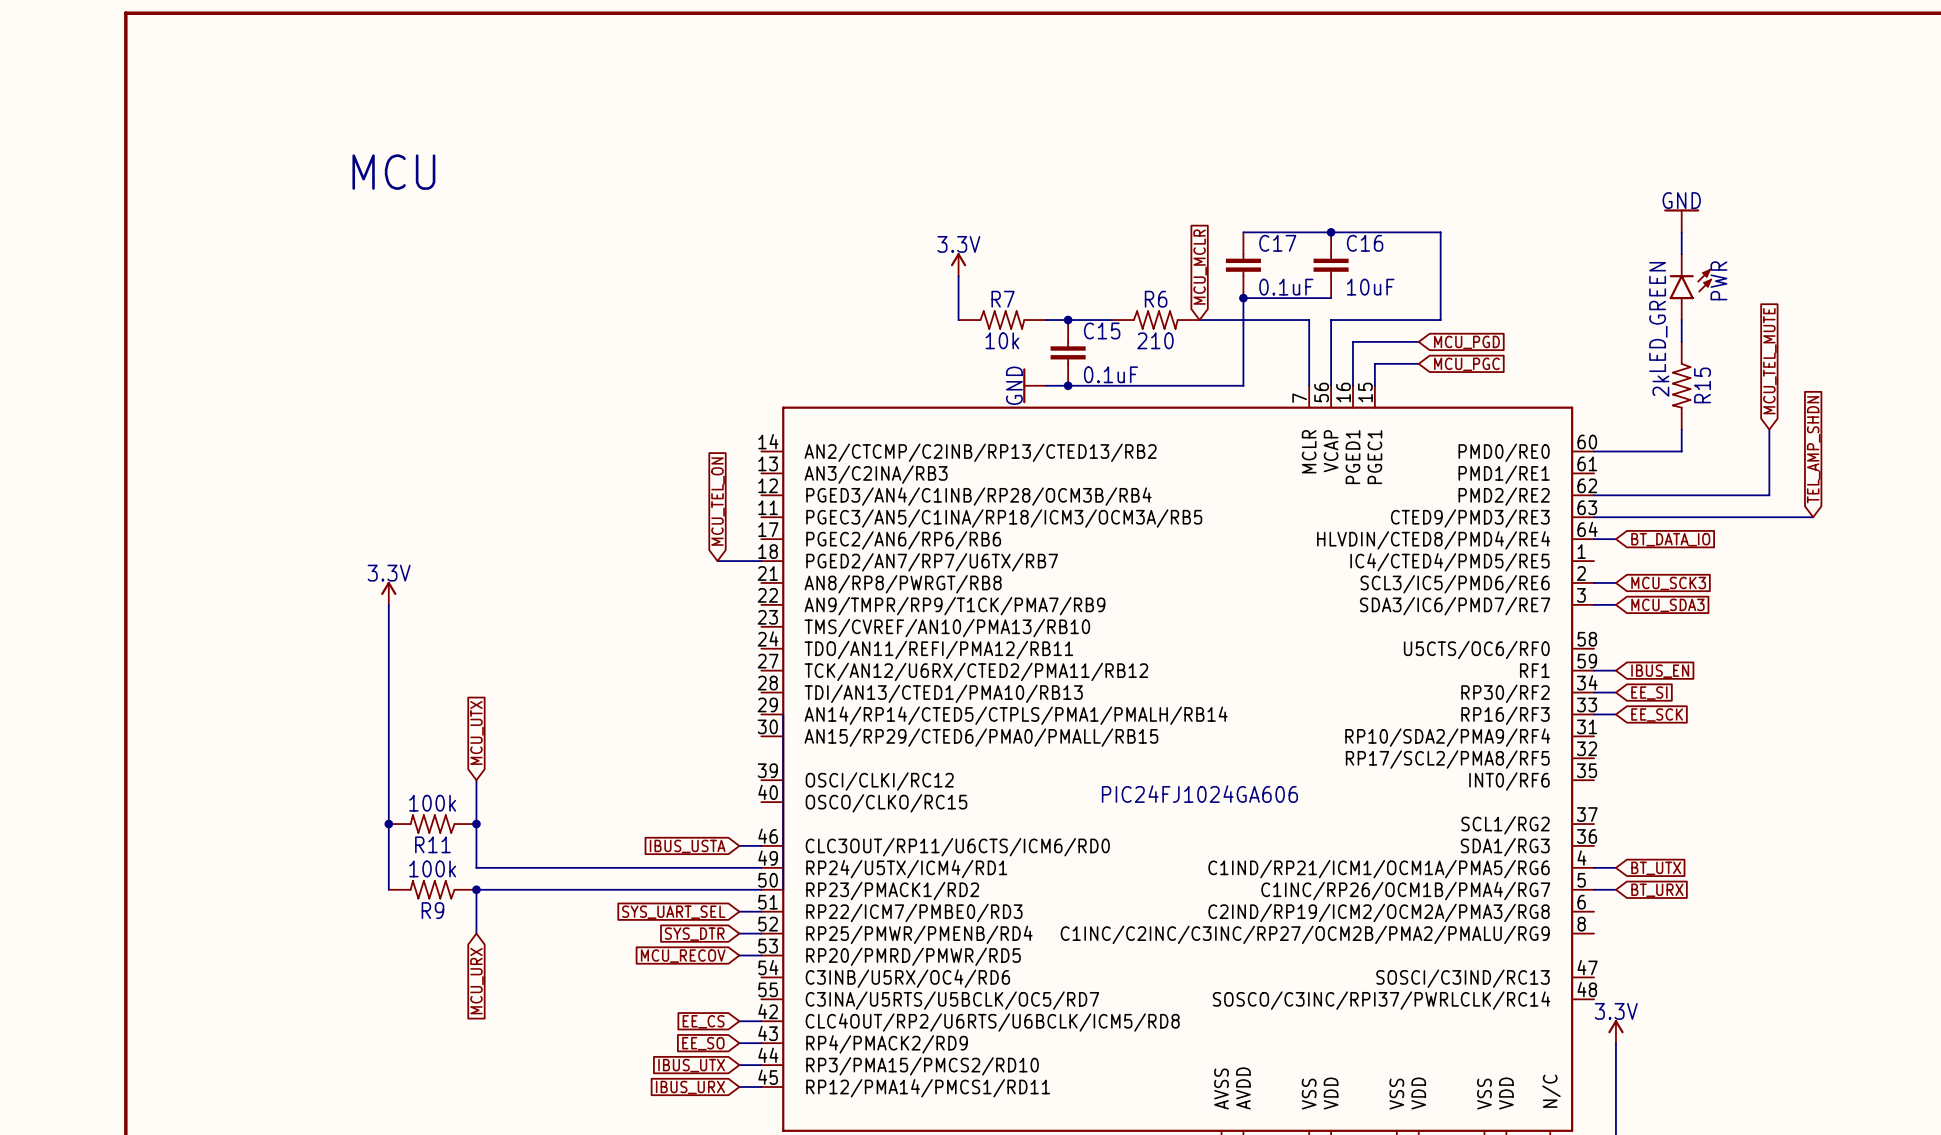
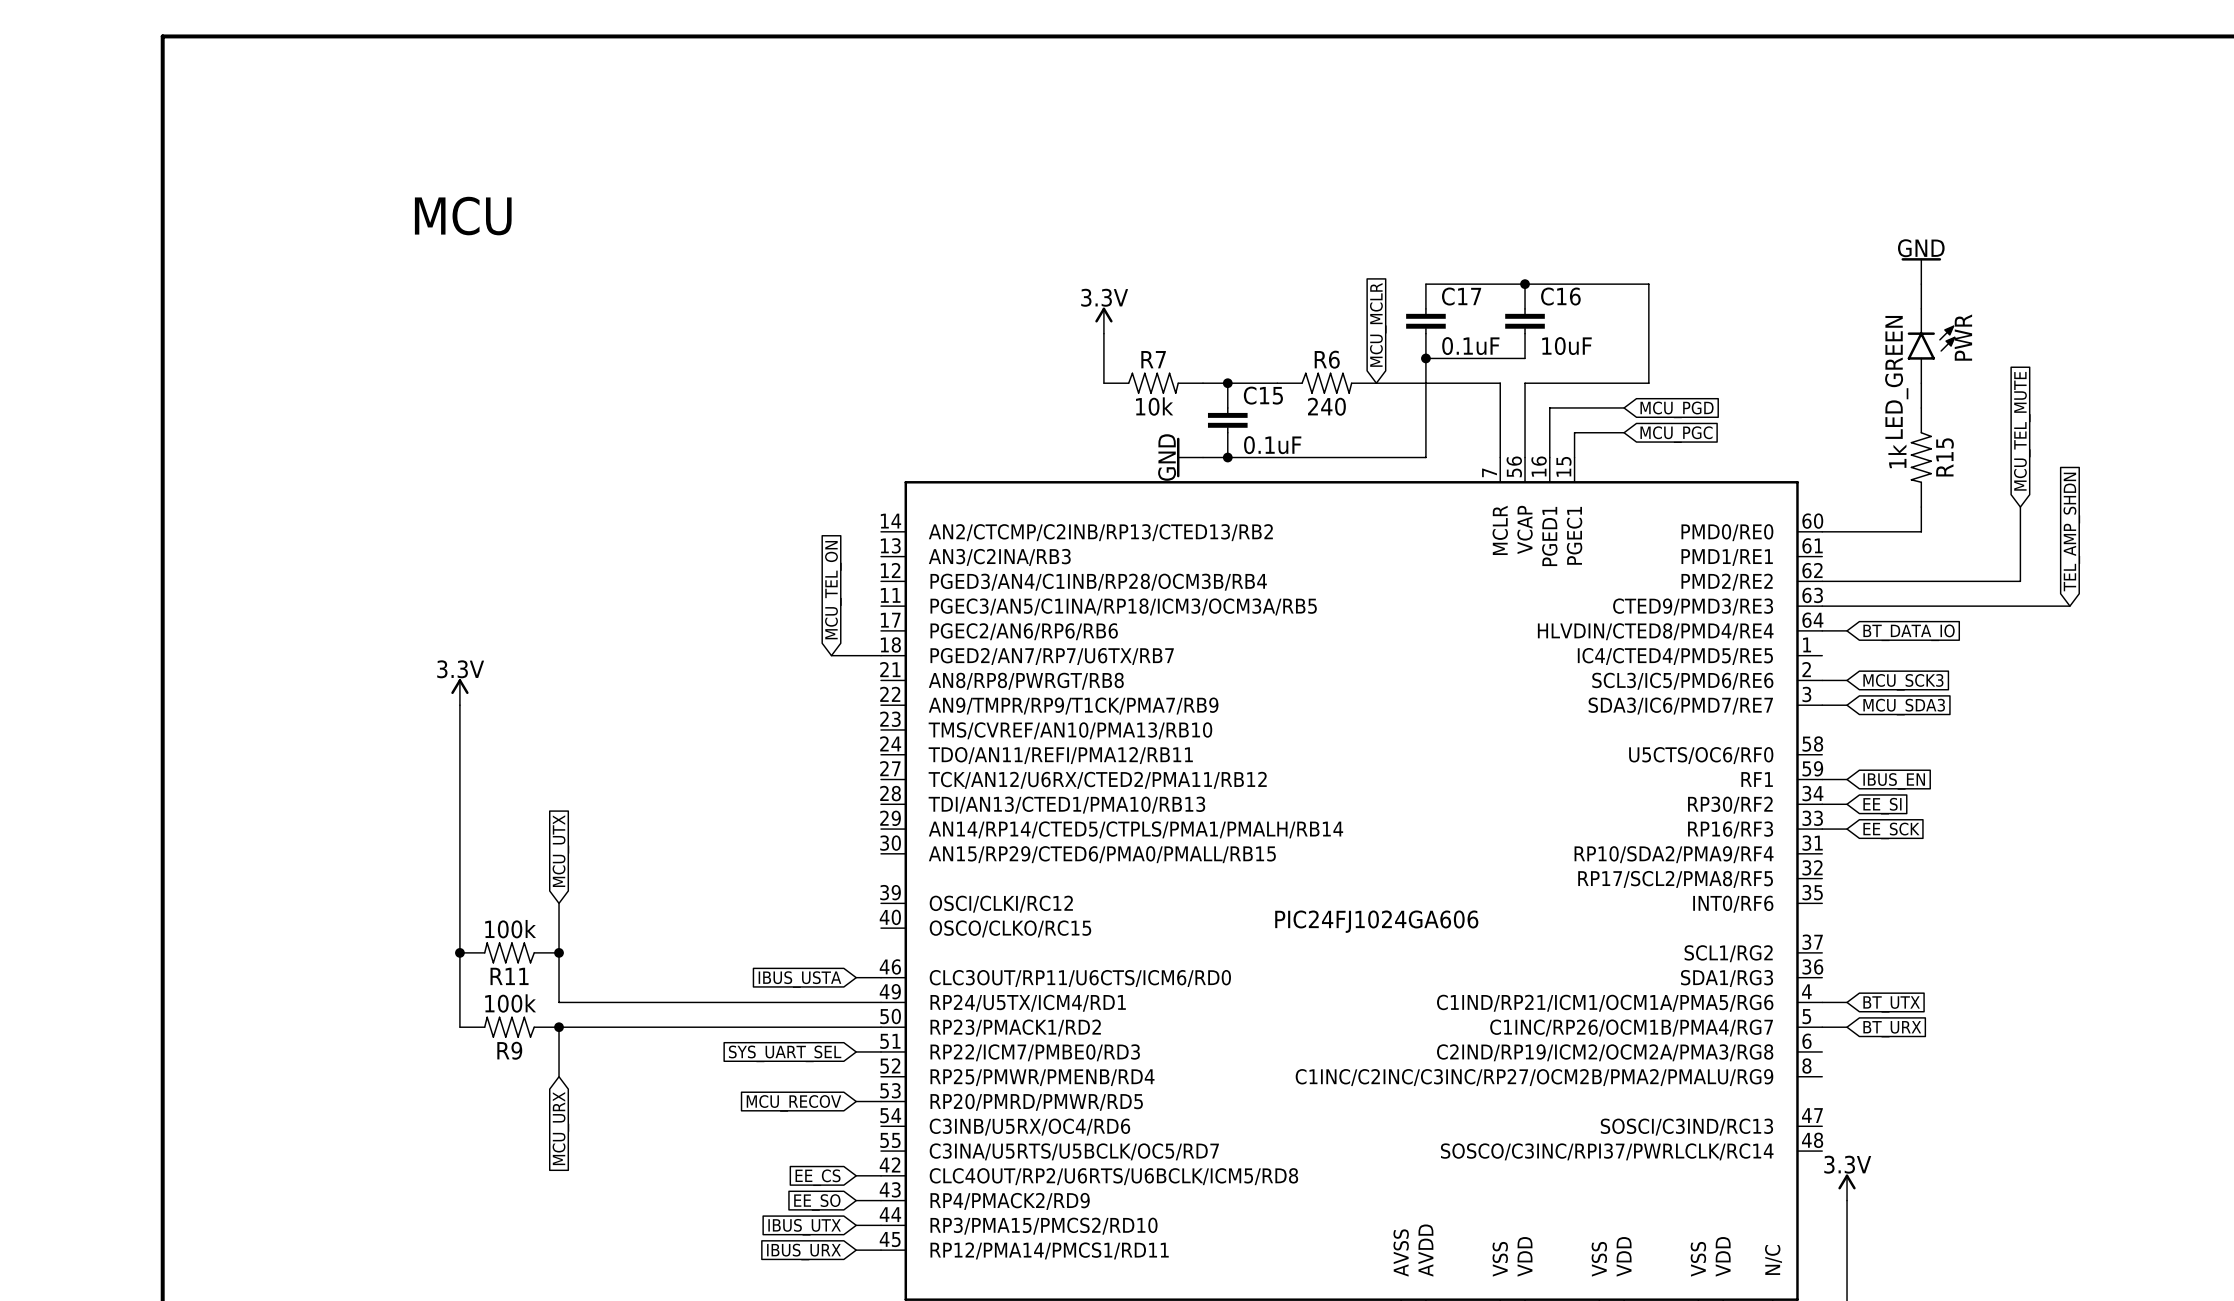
R6 value: 210 (1155, 340) -> 240 (1326, 406)
R15 value: 2k (1660, 386) -> 1k (1897, 456)
wire: (739, 933) (761, 933) -> none
global label: SYS_DTR (694, 934) -> none

